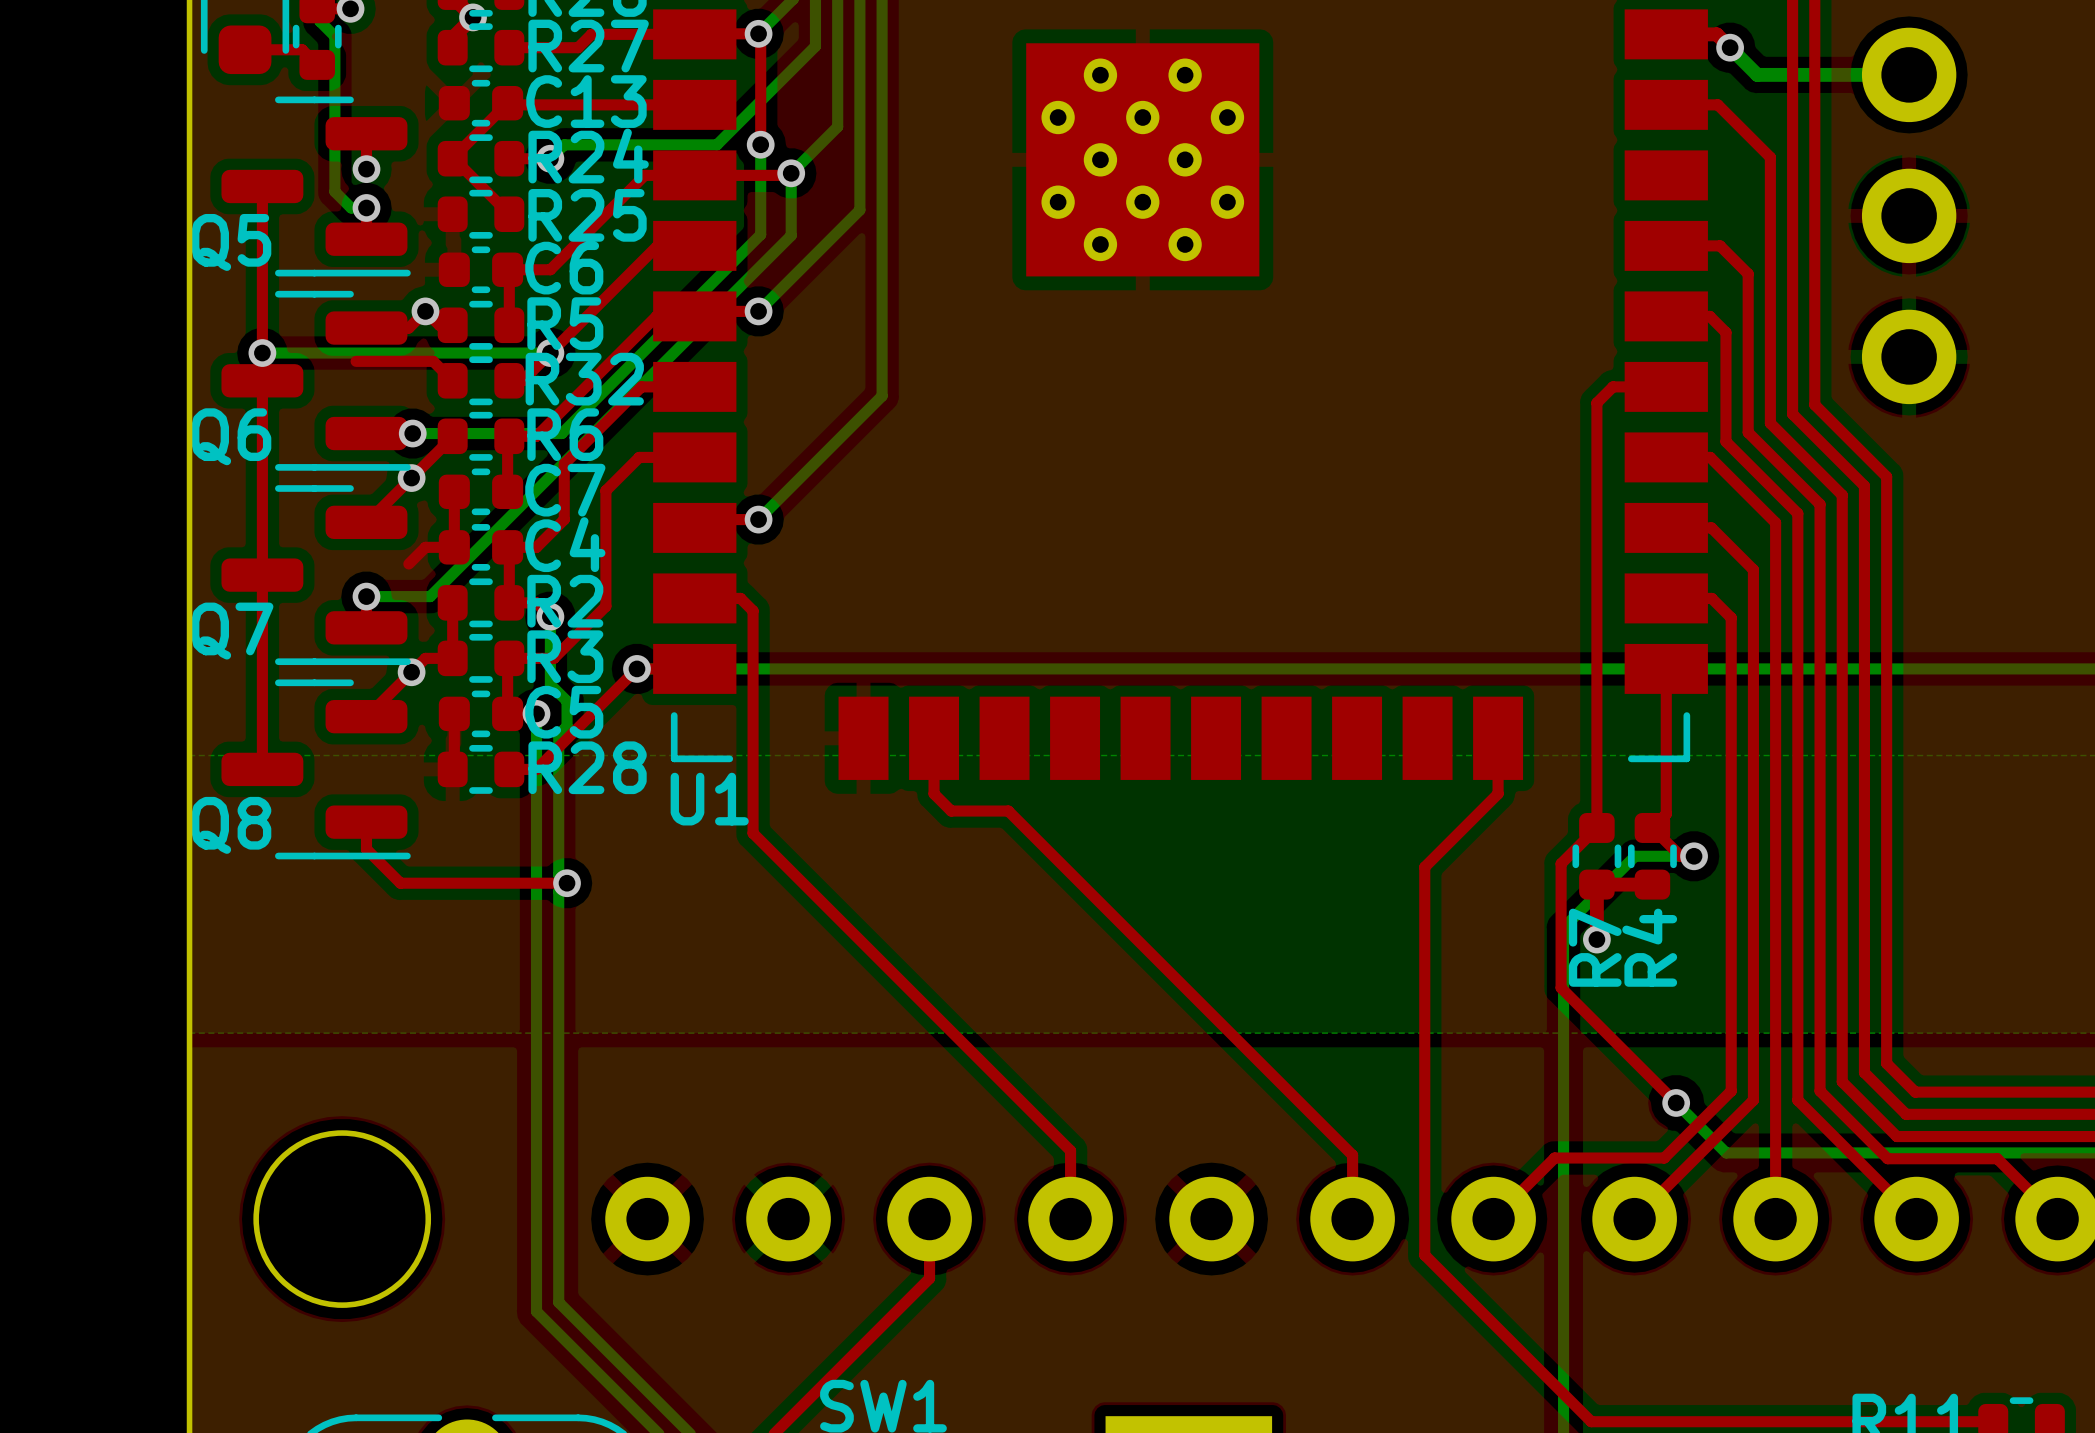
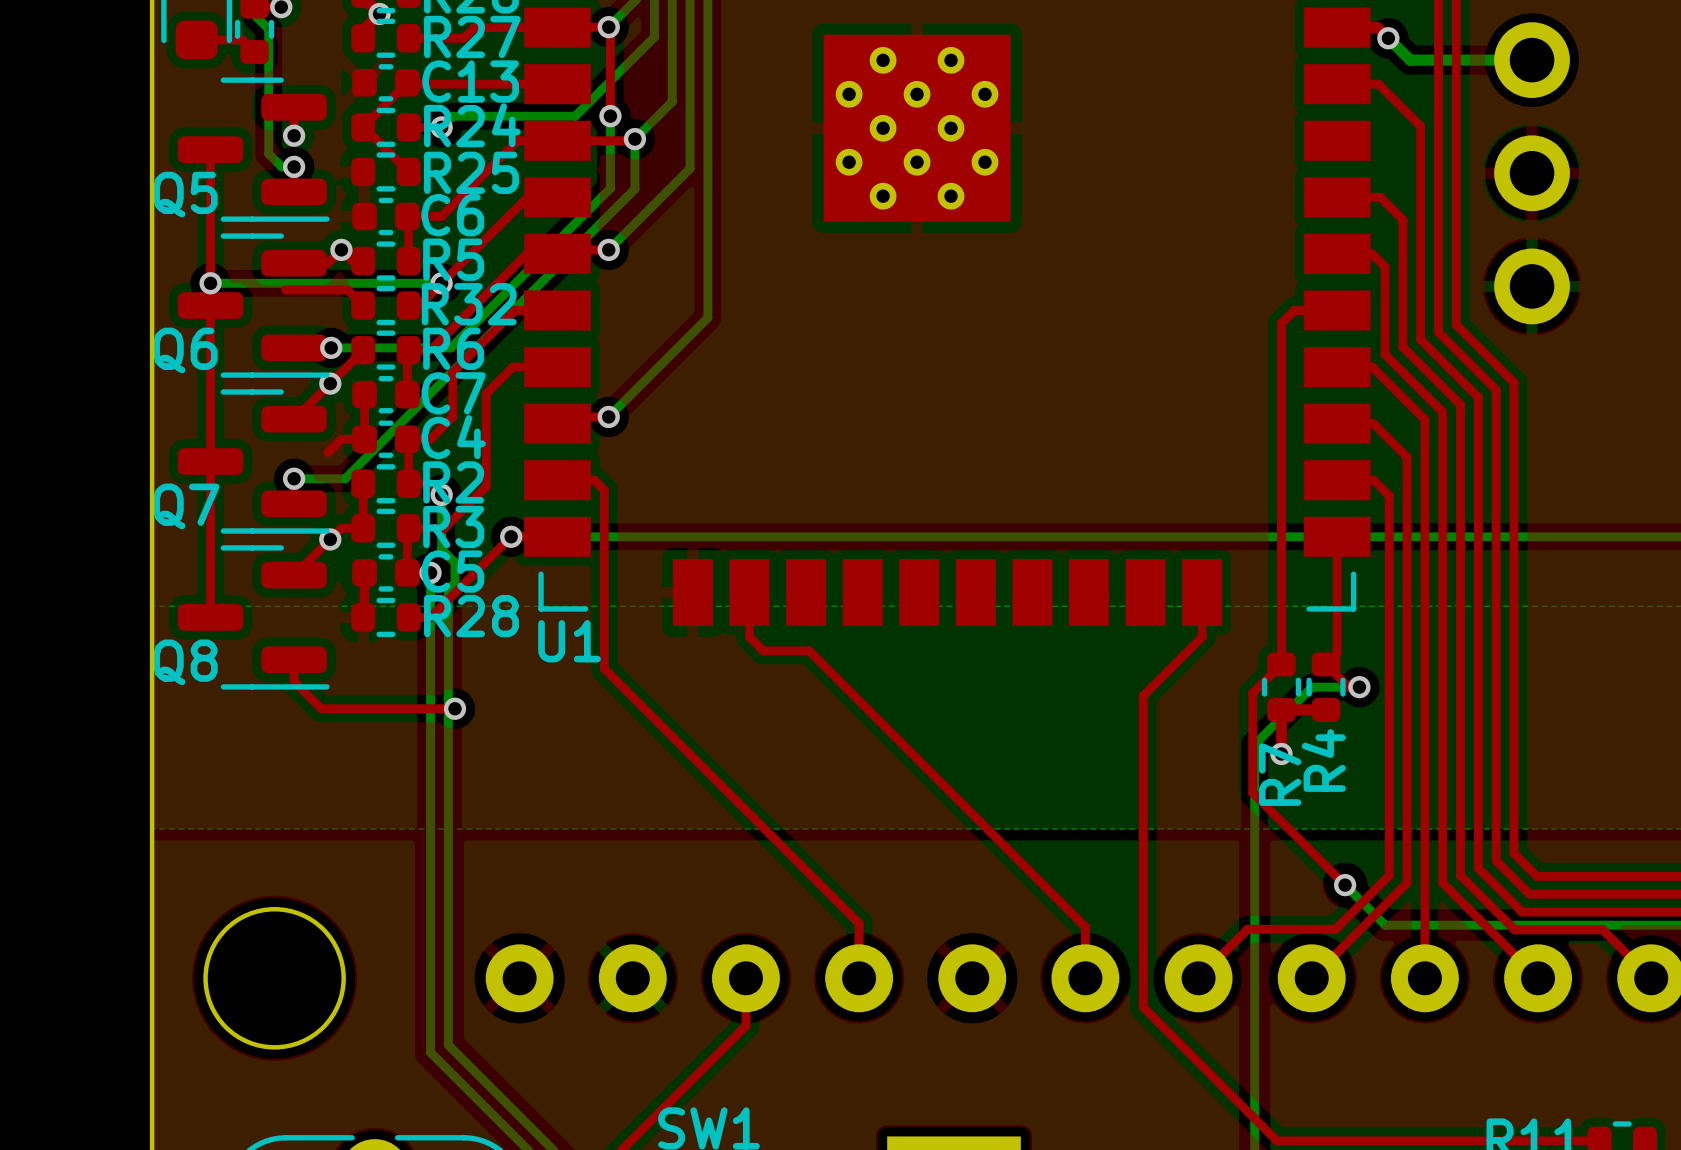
R7 name position: R7 (1595, 947) -> R7 (1280, 774)

